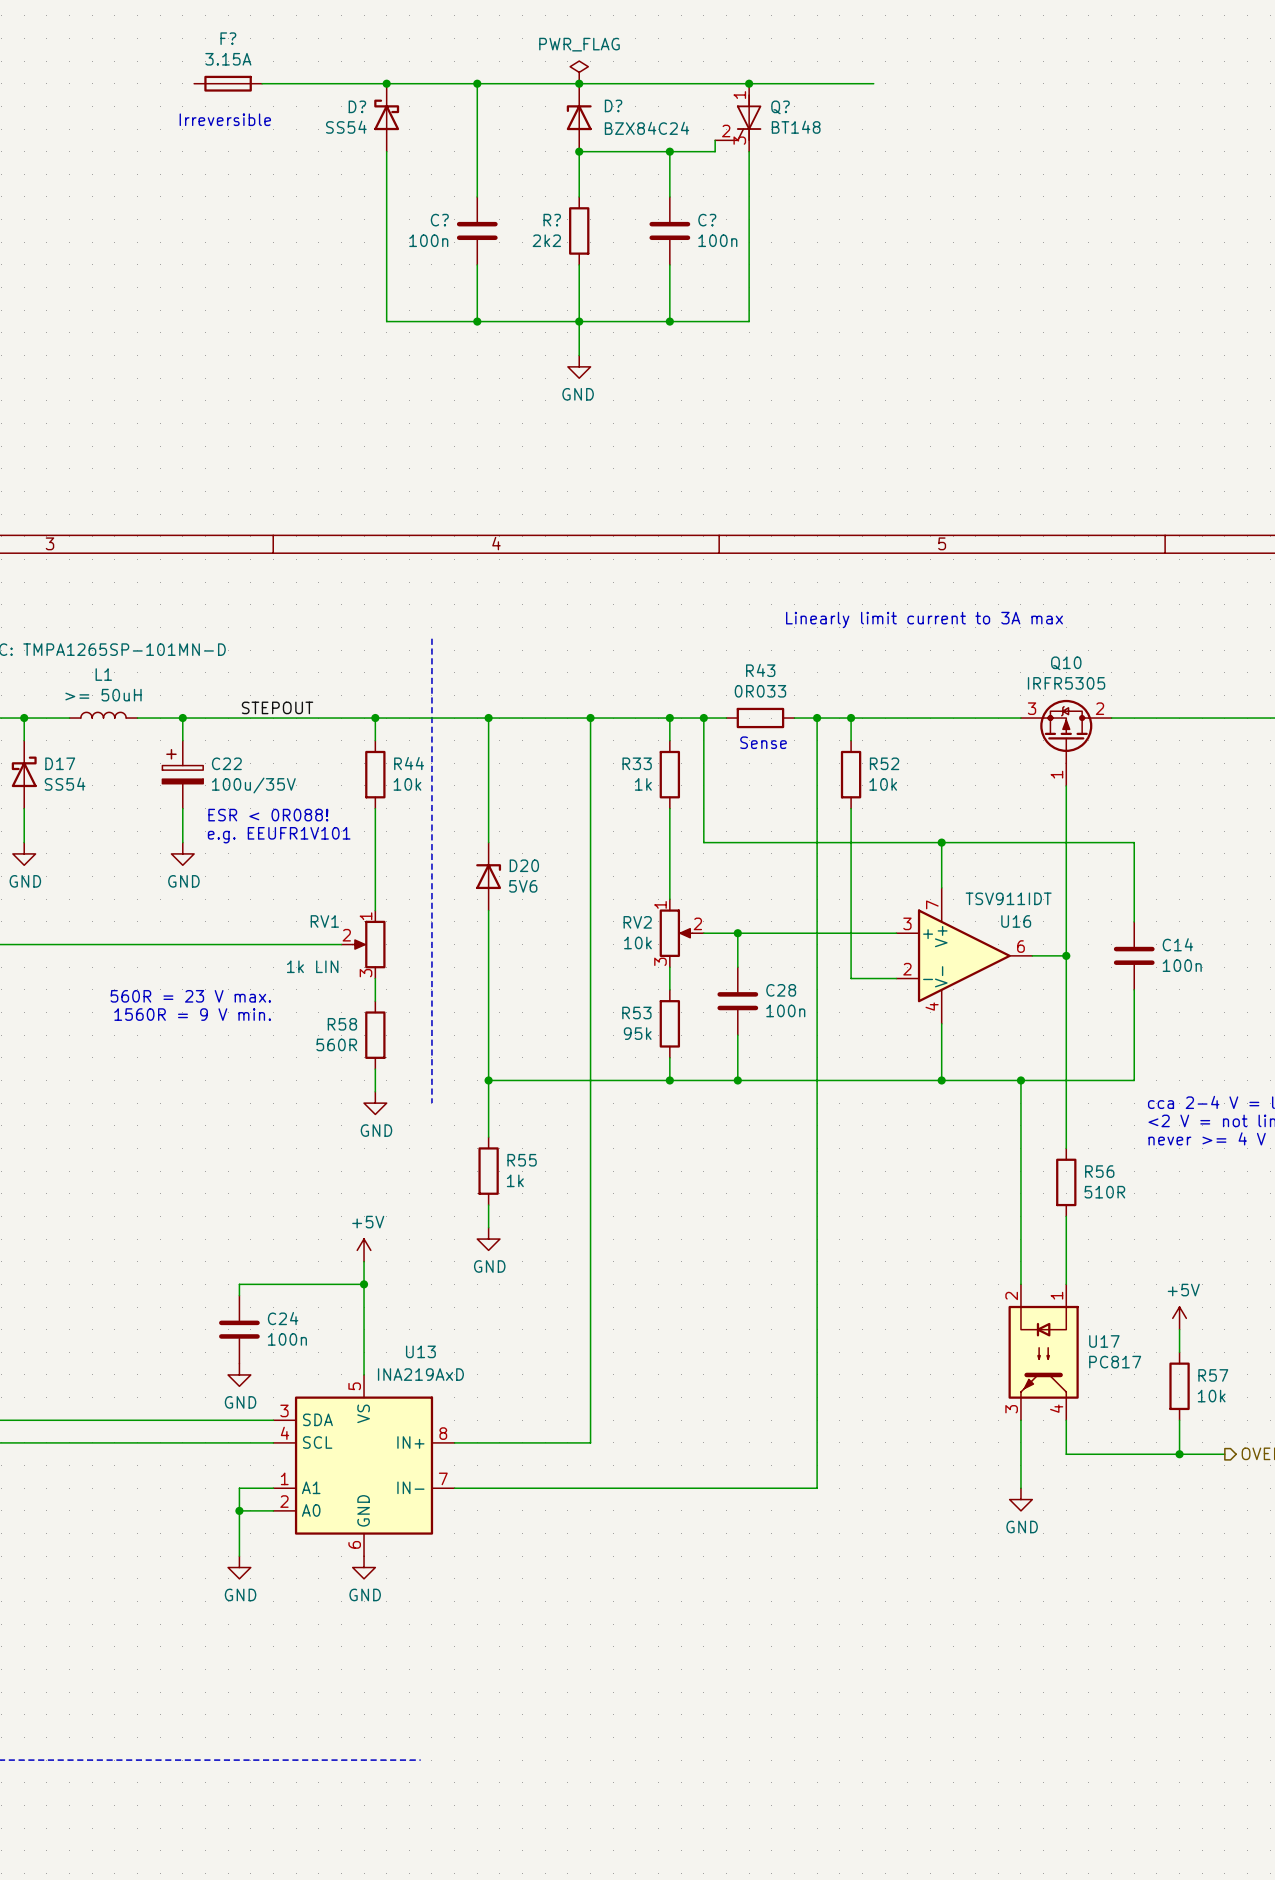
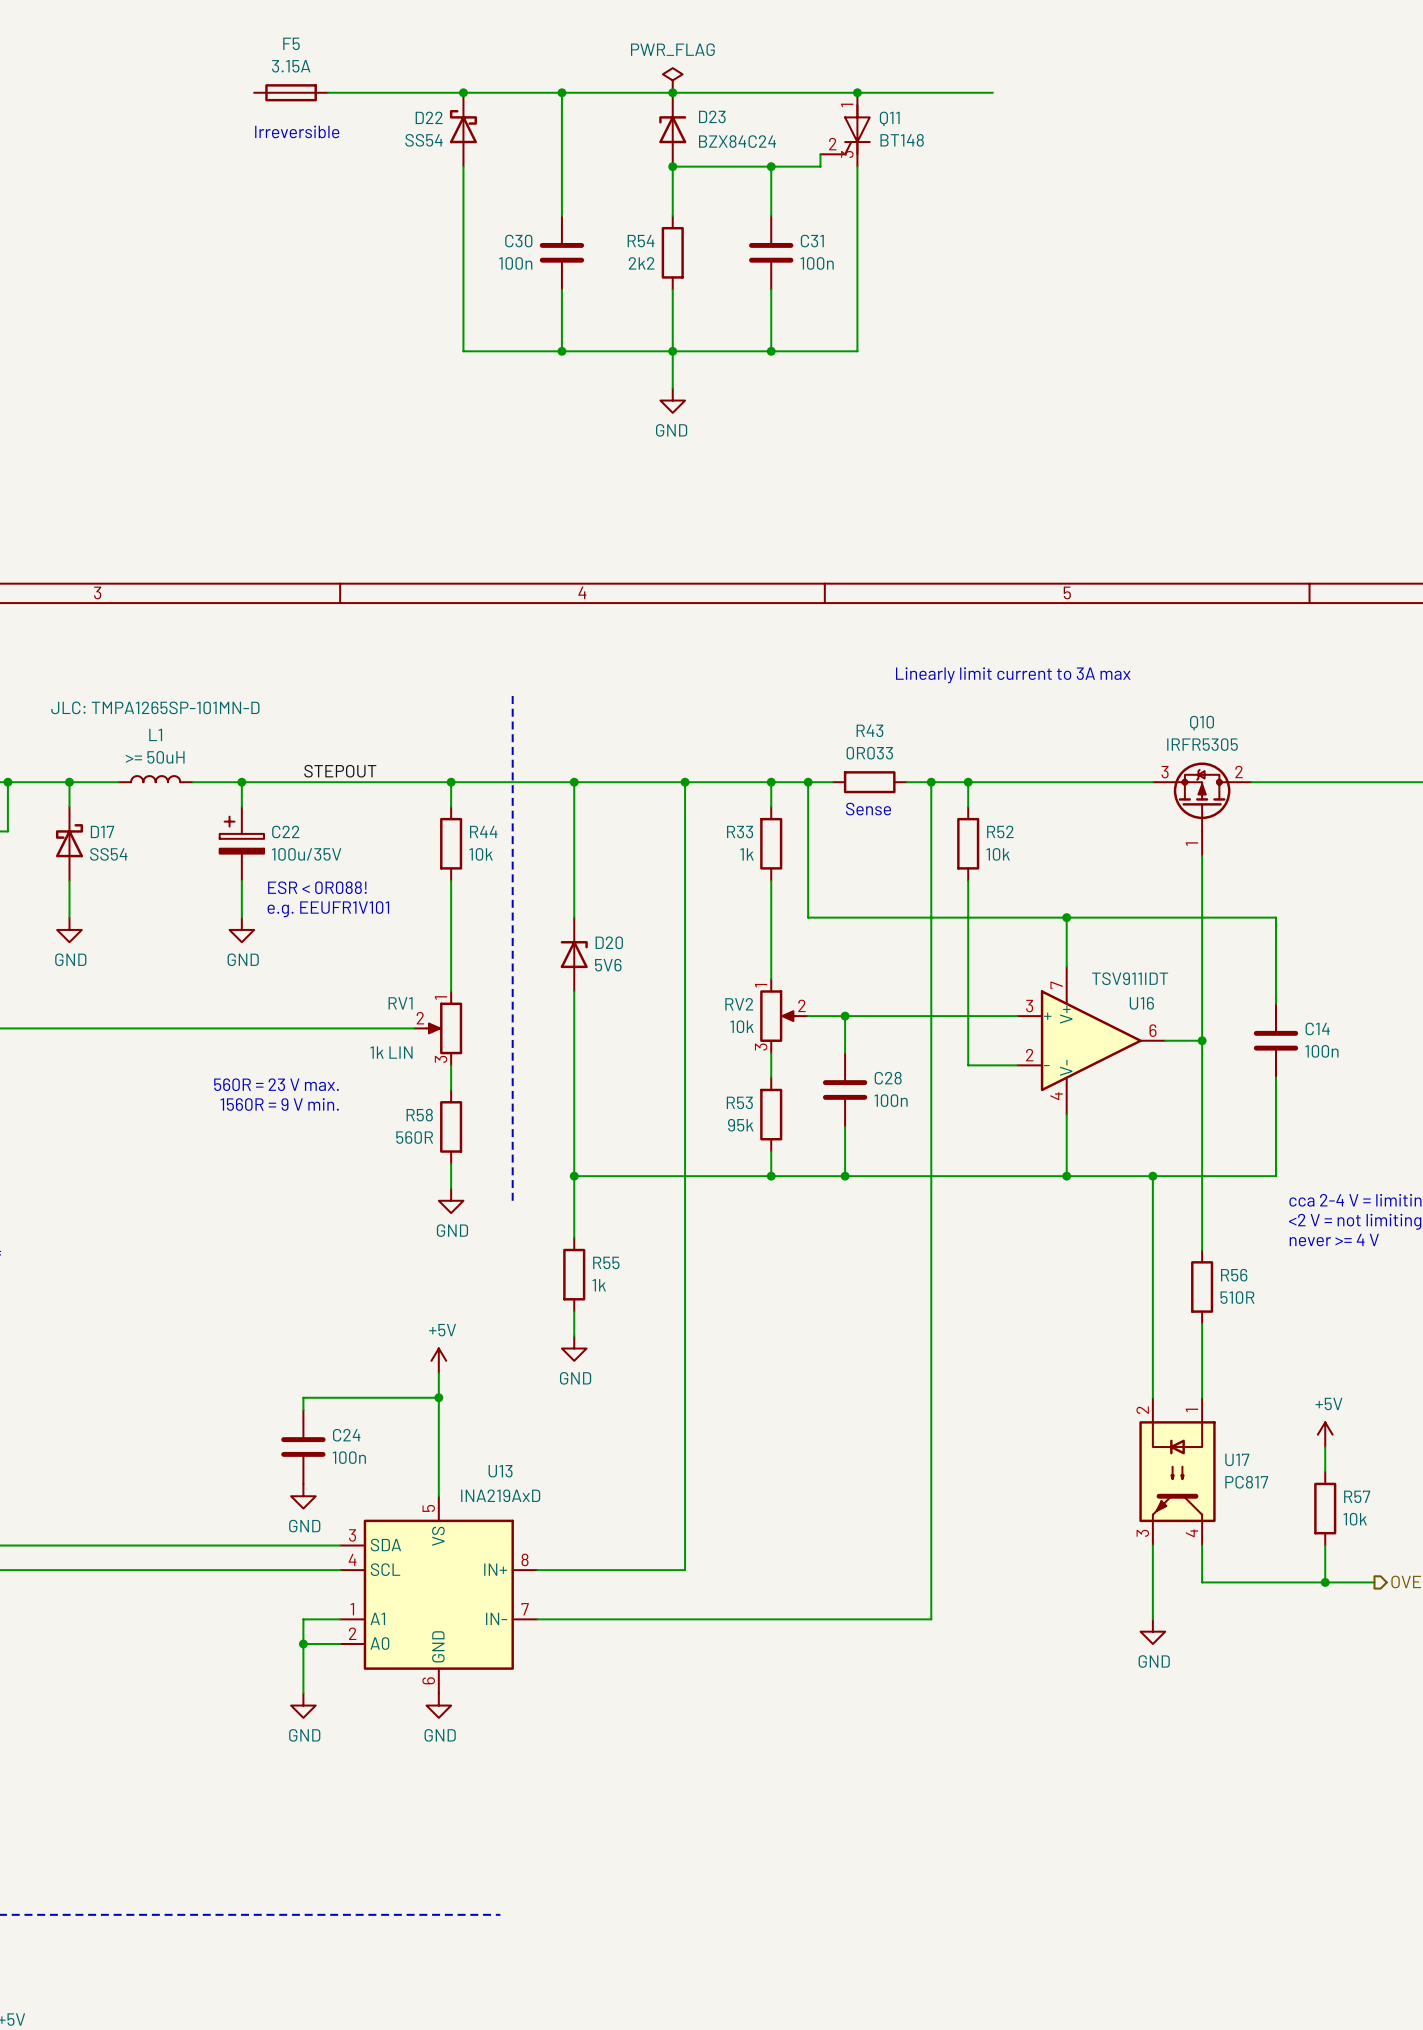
F? name: F? (228, 38) -> F5 (291, 43)
D? name: D? (613, 105) -> D23 (712, 116)
D? name: D? (357, 106) -> D22 (429, 117)
Q? name: Q? (780, 107) -> Q11 (889, 118)
C? name: C? (439, 220) -> C30 (518, 241)
R? name: R? (552, 220) -> R54 (641, 241)
C? name: C? (707, 220) -> C31 (812, 241)

